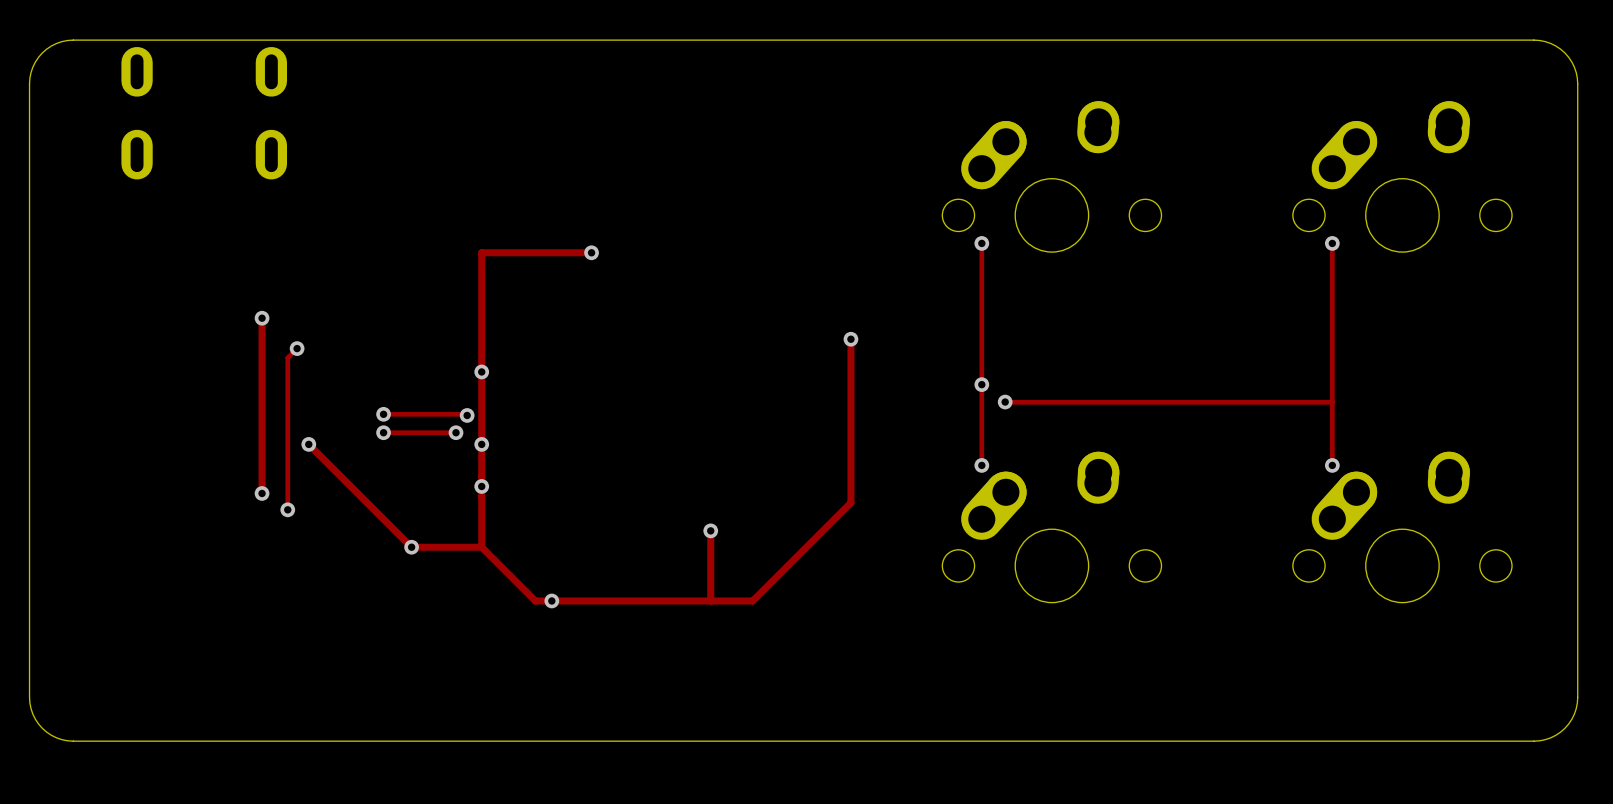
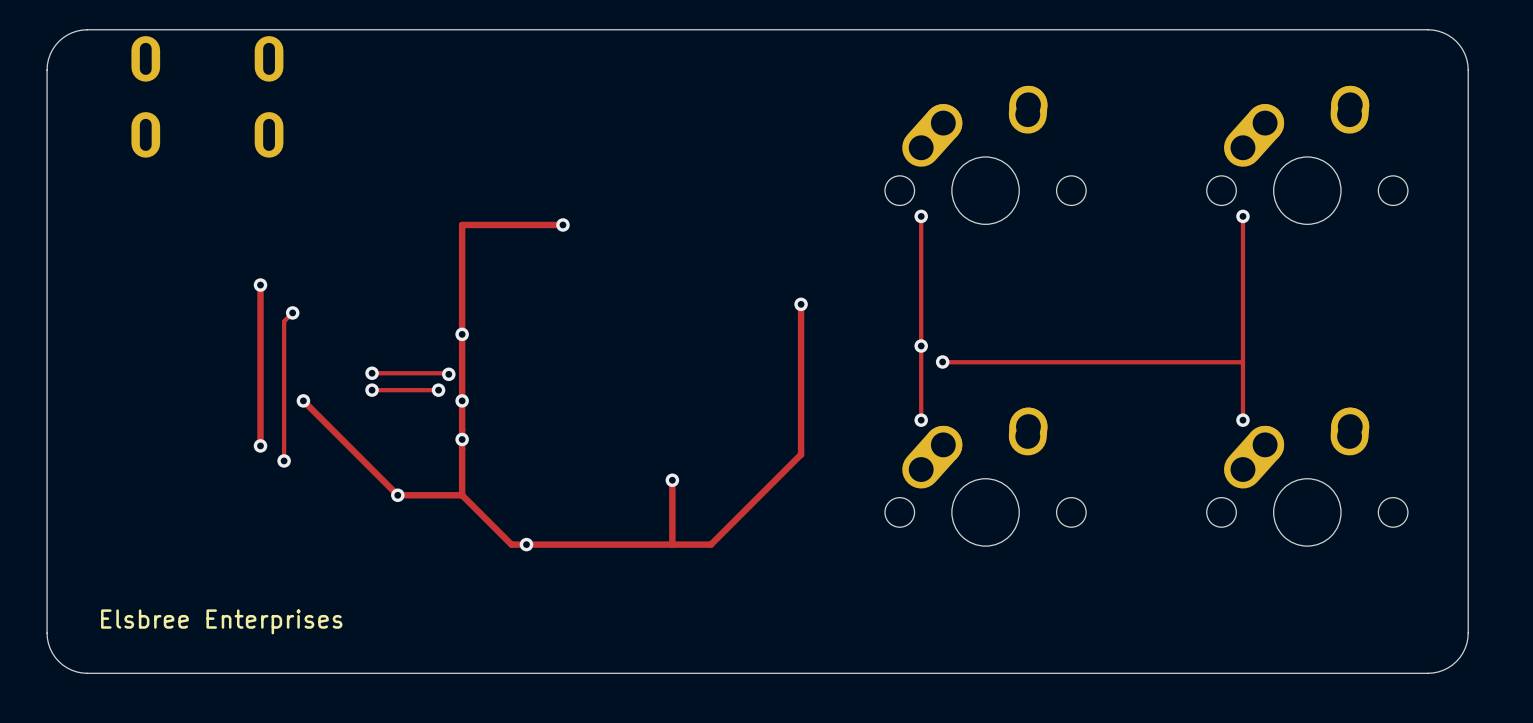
text: none -> Elsbree Enterprises (221, 621)

